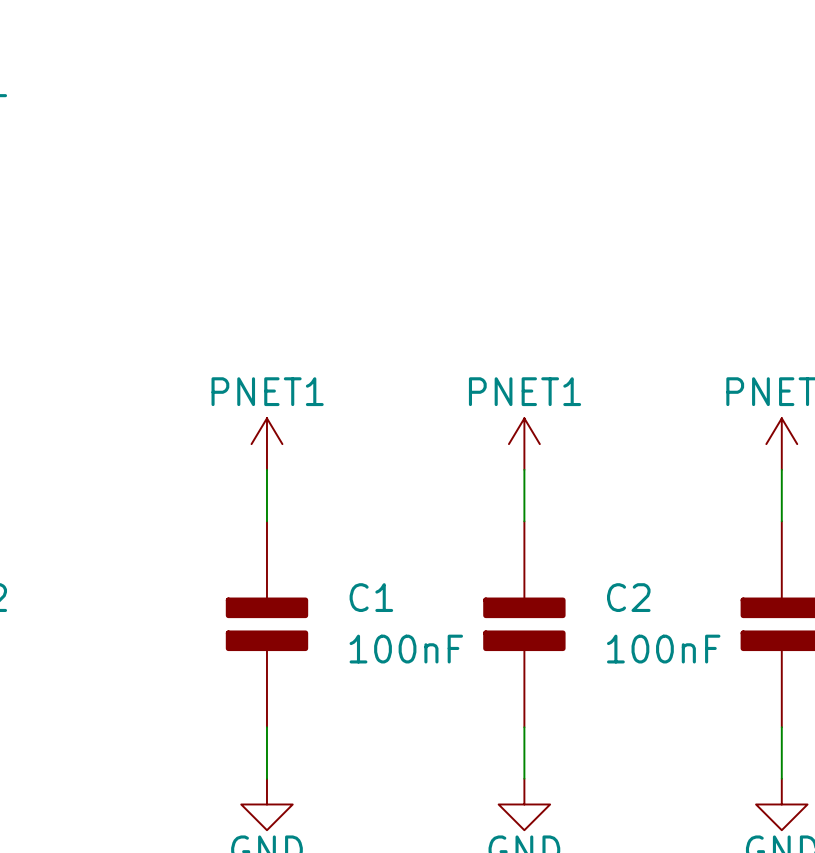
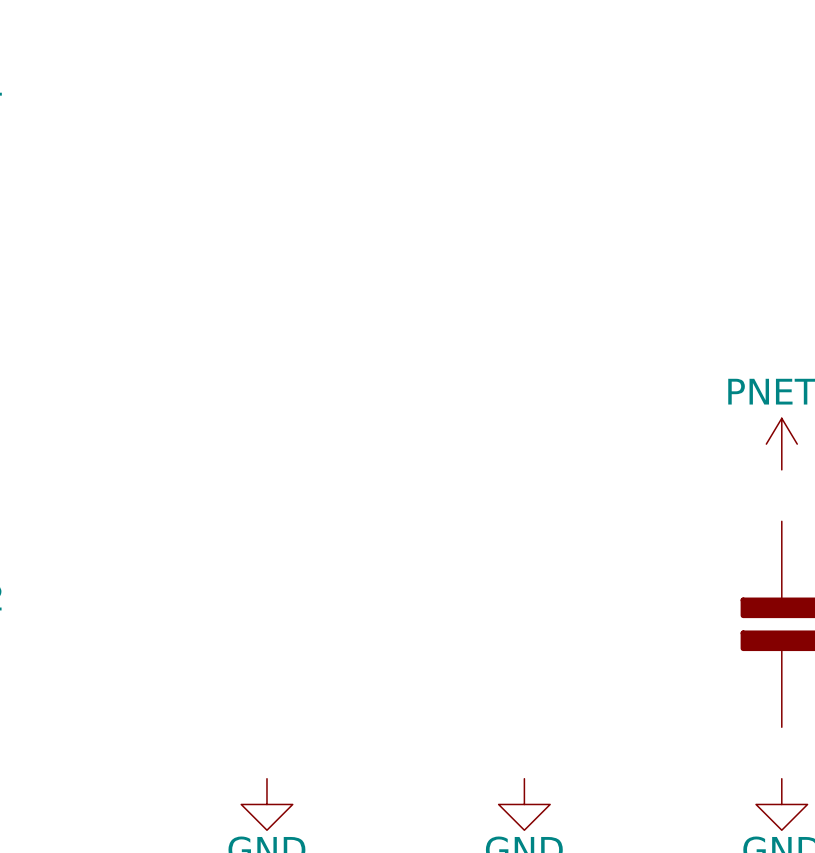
power symbol: PNET1 (266, 444) -> none
power symbol: PNET1 (524, 444) -> none
wire: (266, 469) (266, 521) -> none
wire: (524, 469) (524, 521) -> none
wire: (781, 469) (781, 521) -> none
C1: 100nF (266, 624) -> none
C2: 100nF (524, 624) -> none
wire: (266, 727) (266, 778) -> none
wire: (524, 727) (524, 778) -> none
wire: (781, 727) (781, 778) -> none

